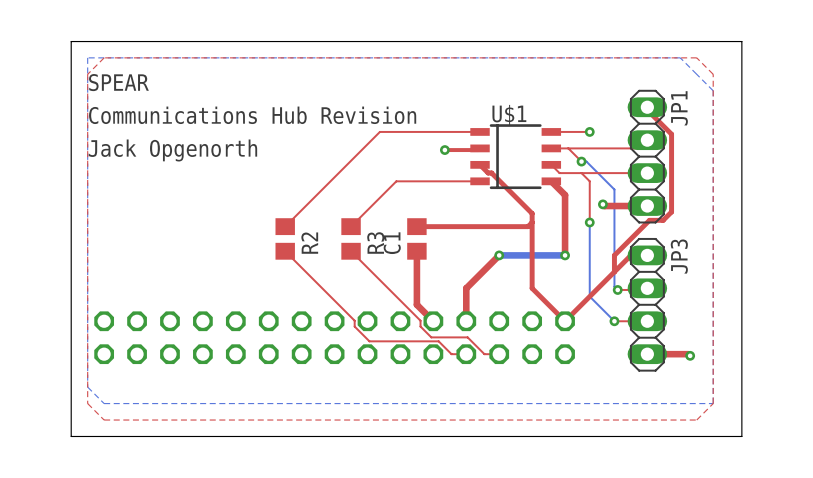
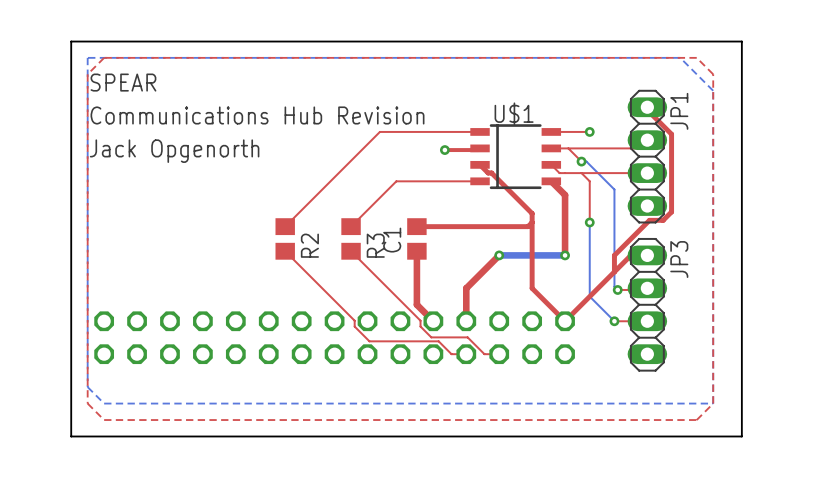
top track: (602, 204) (604, 206) (647, 206) -> none
via: (602, 204) -> none
top track: (647, 354) (688, 354) (690, 355) -> none
via: (690, 355) -> none

